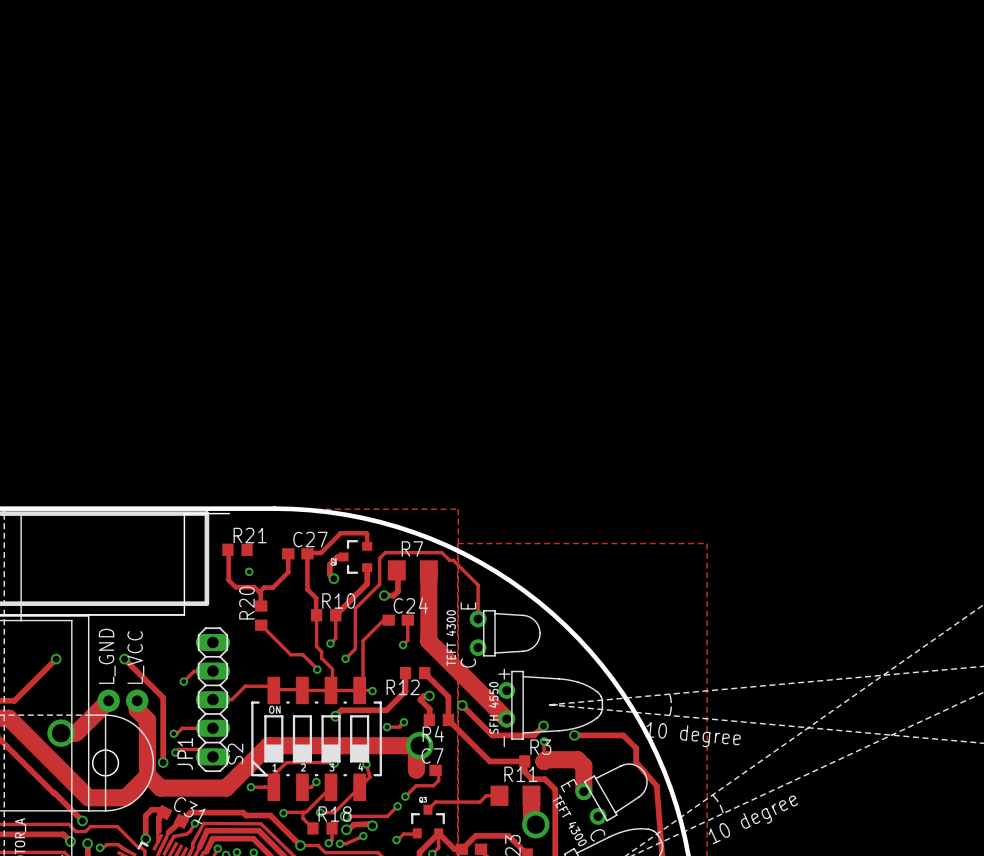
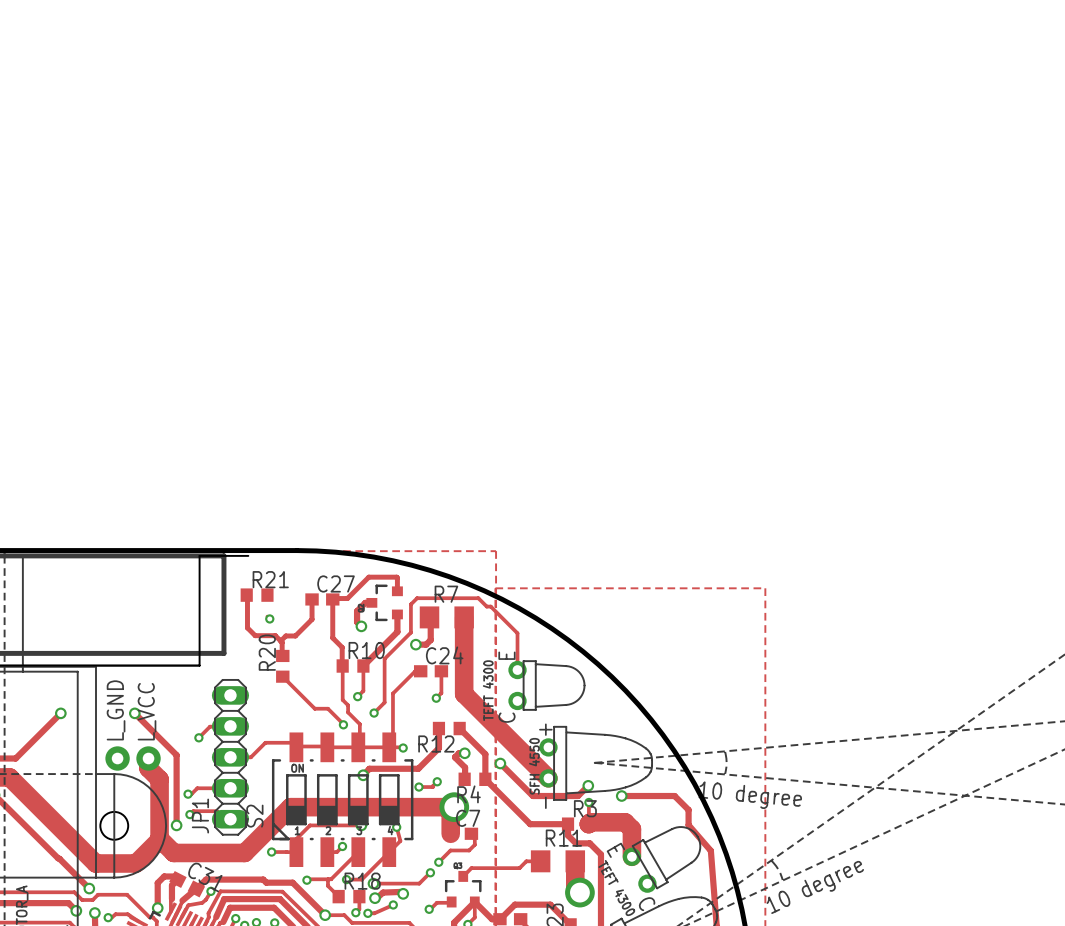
track: (108, 700) (76, 732) (61, 733) -> none
via: (61, 733) -> none

